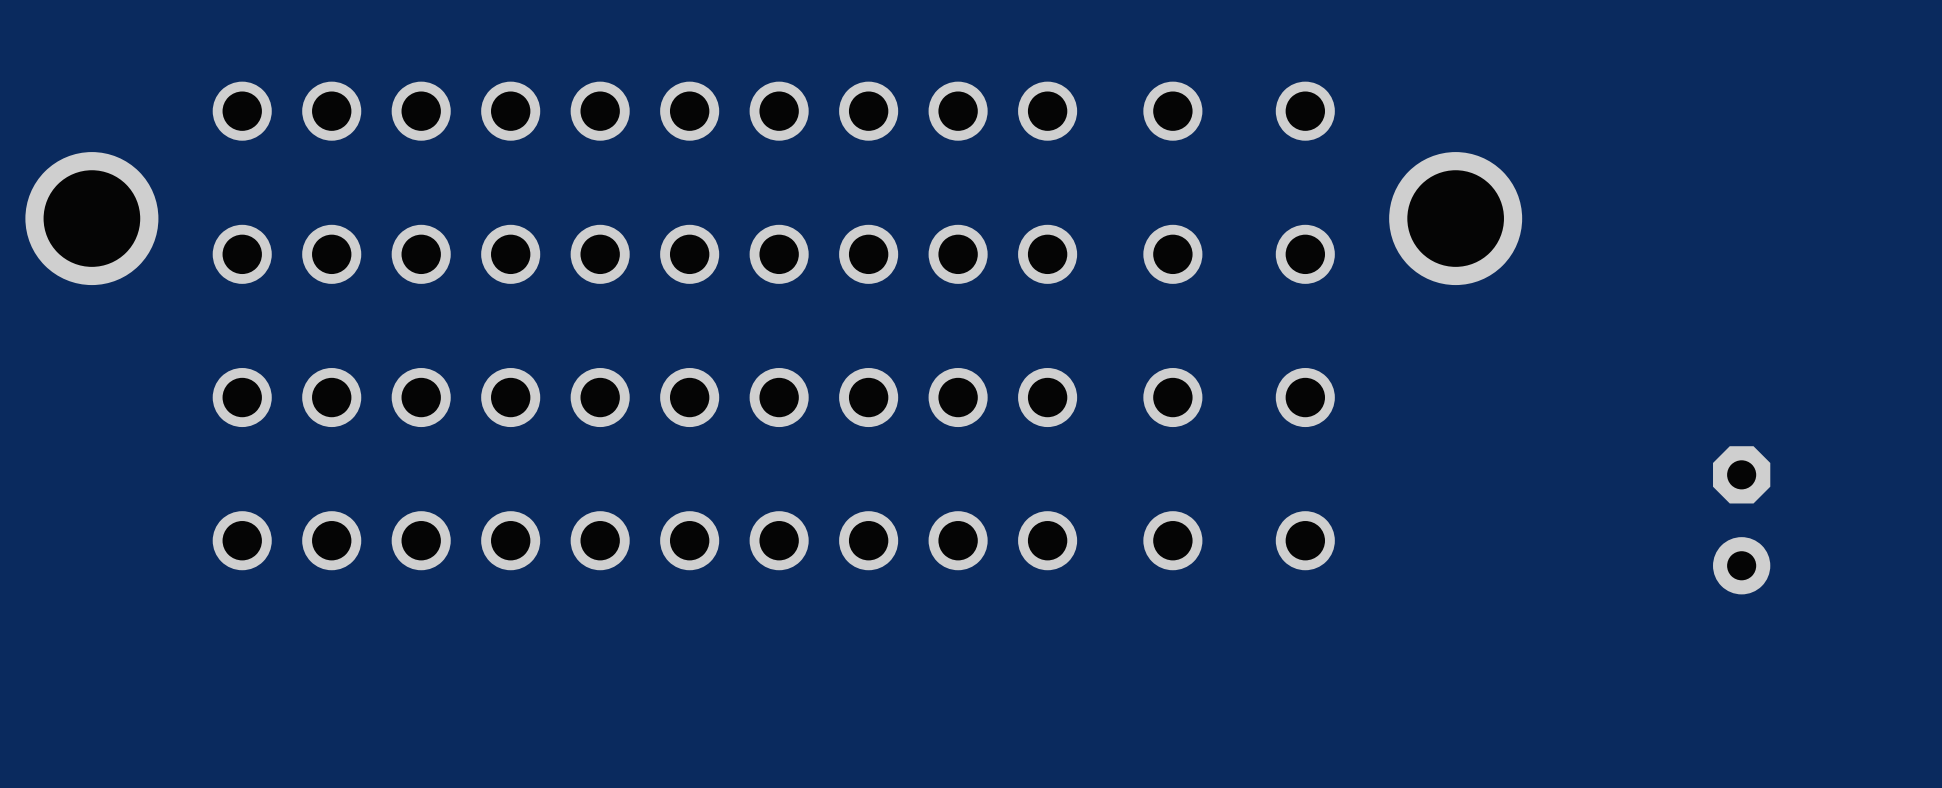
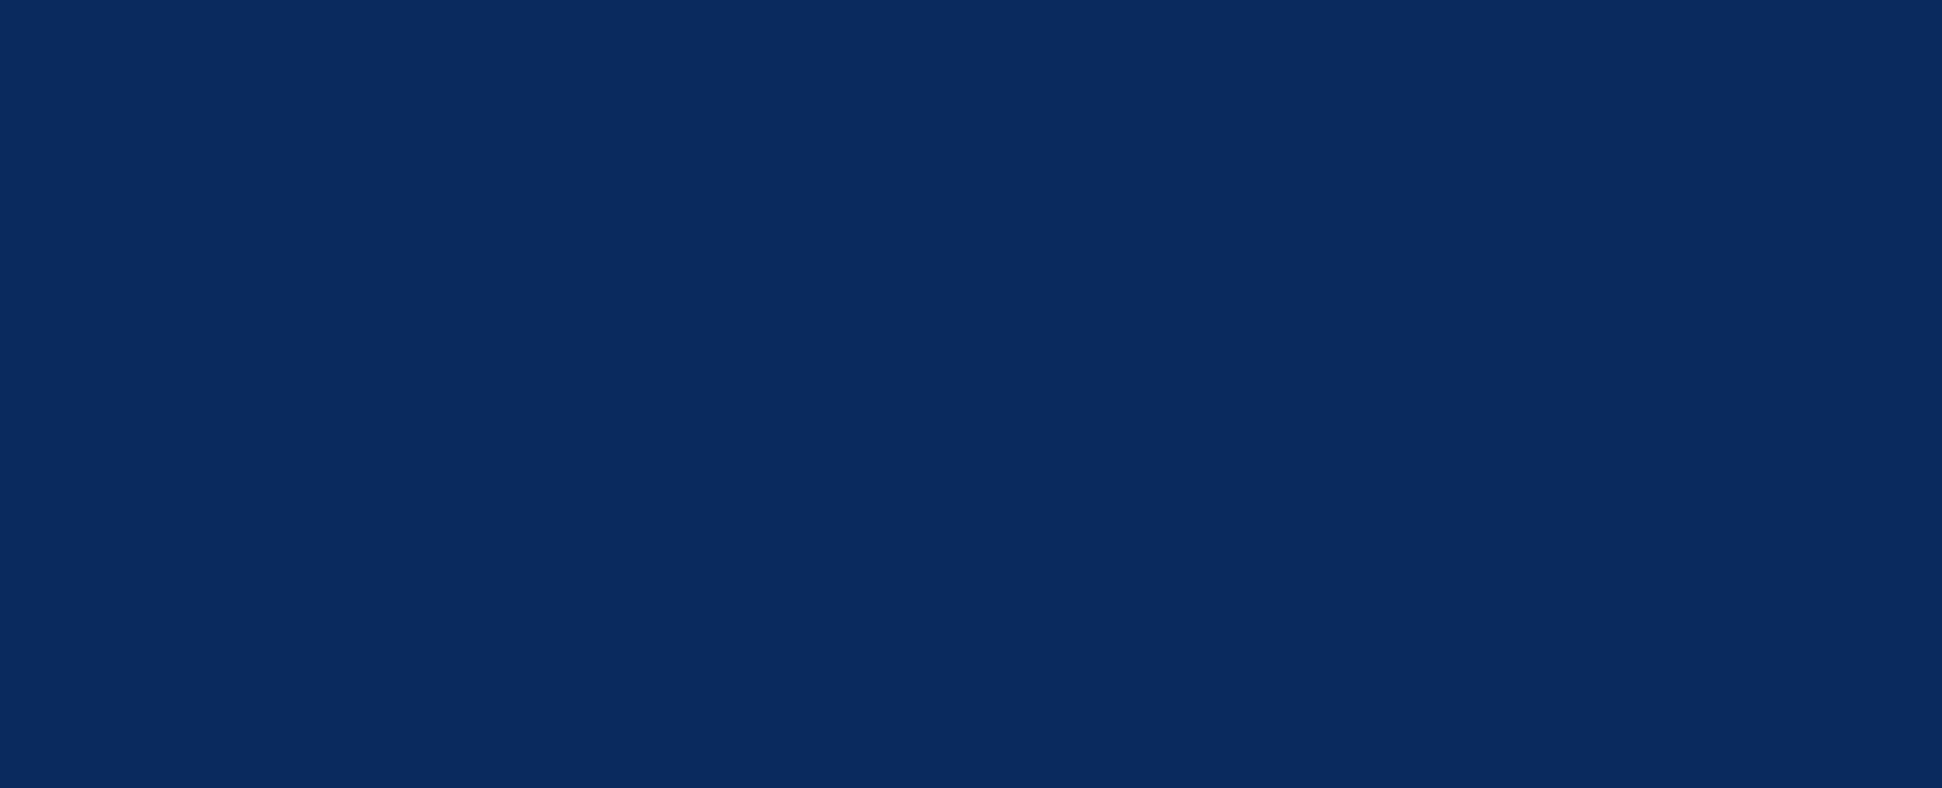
part: (773, 325) -> none
part: (1741, 520) -> none

